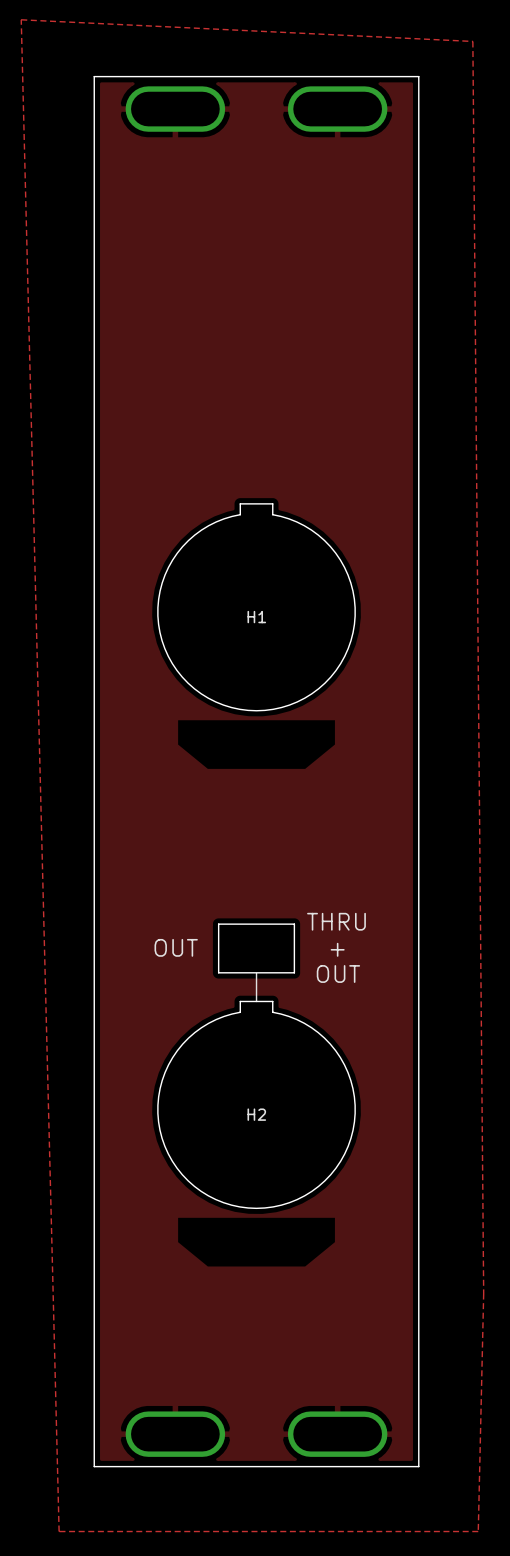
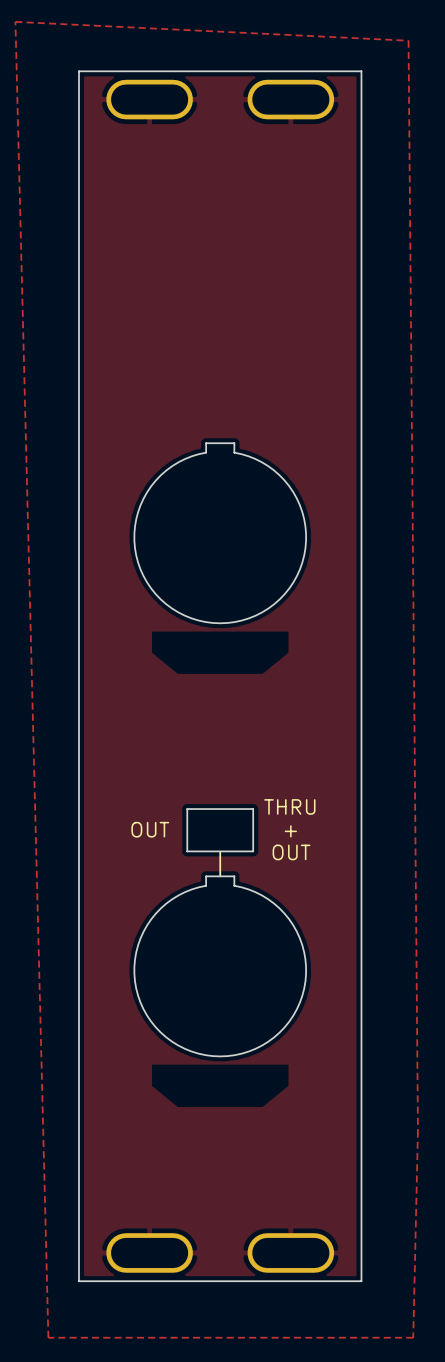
H1: (256, 617) -> none
H2: (256, 1114) -> none

